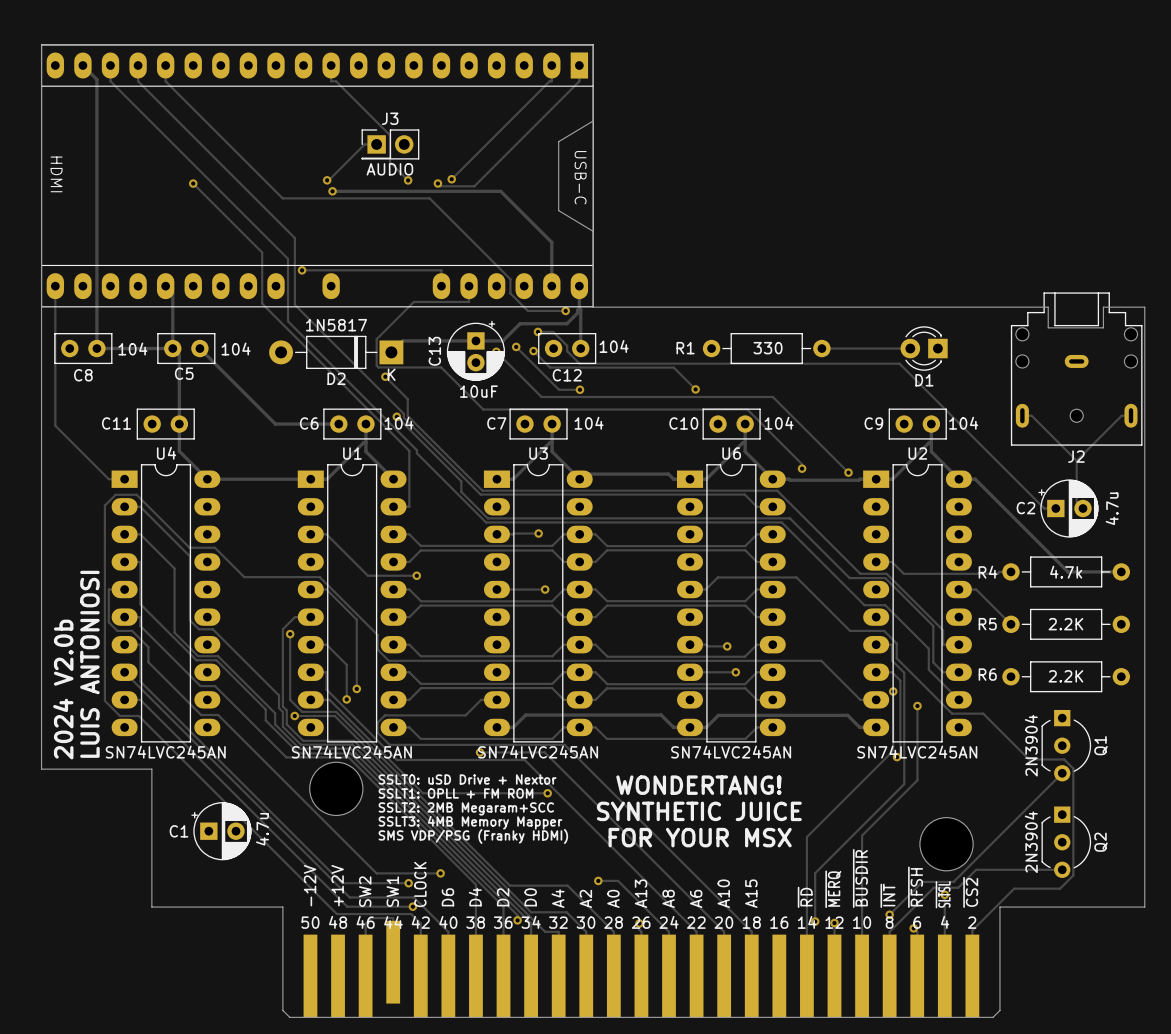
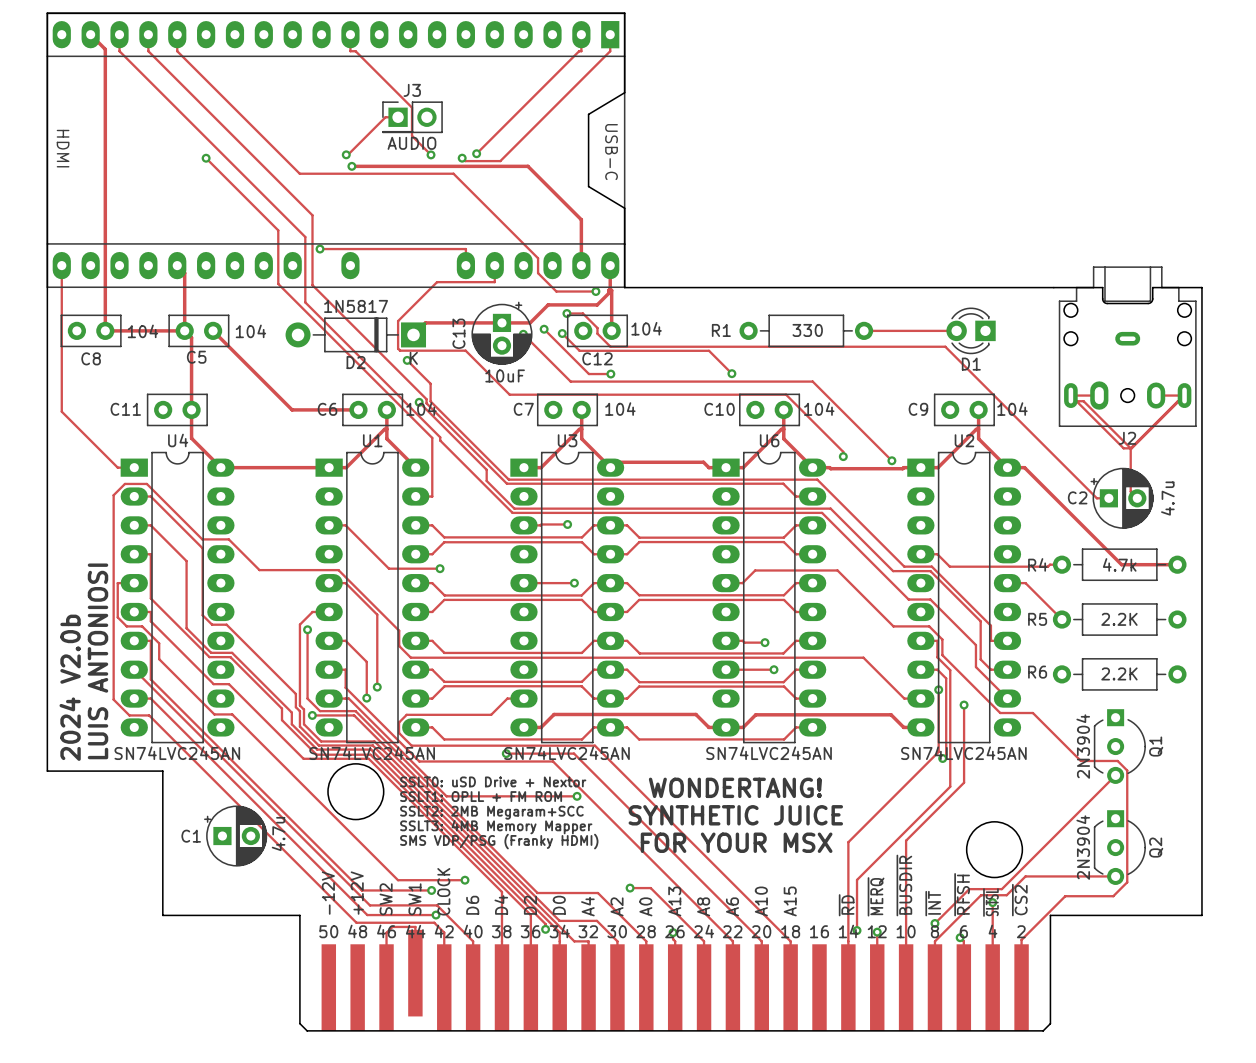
J2 footprint: [1010, 292, 1143, 446] -> [1053, 266, 1203, 427]
board edge: (1003, 307) (1048, 307) (1048, 327) (1103, 327) (1103, 307) (1144, 307) -> none
track: none -> (1099, 395) (1070, 395) (1123, 448) (1131, 448) (1184, 395) (1156, 395)

